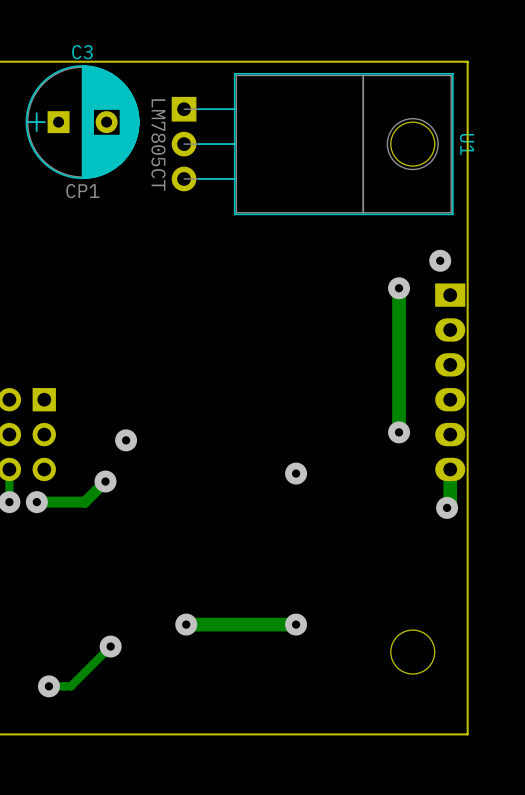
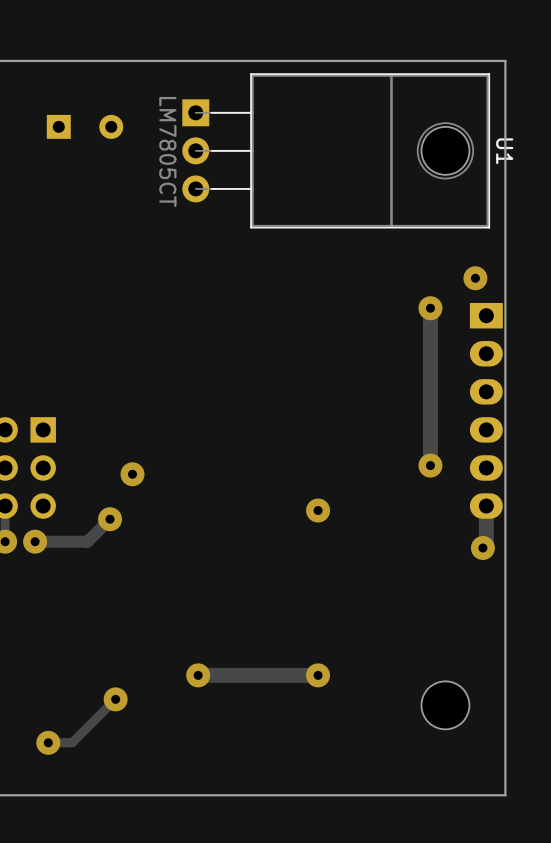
C3 side: bottom (82, 122) -> top (85, 126)

